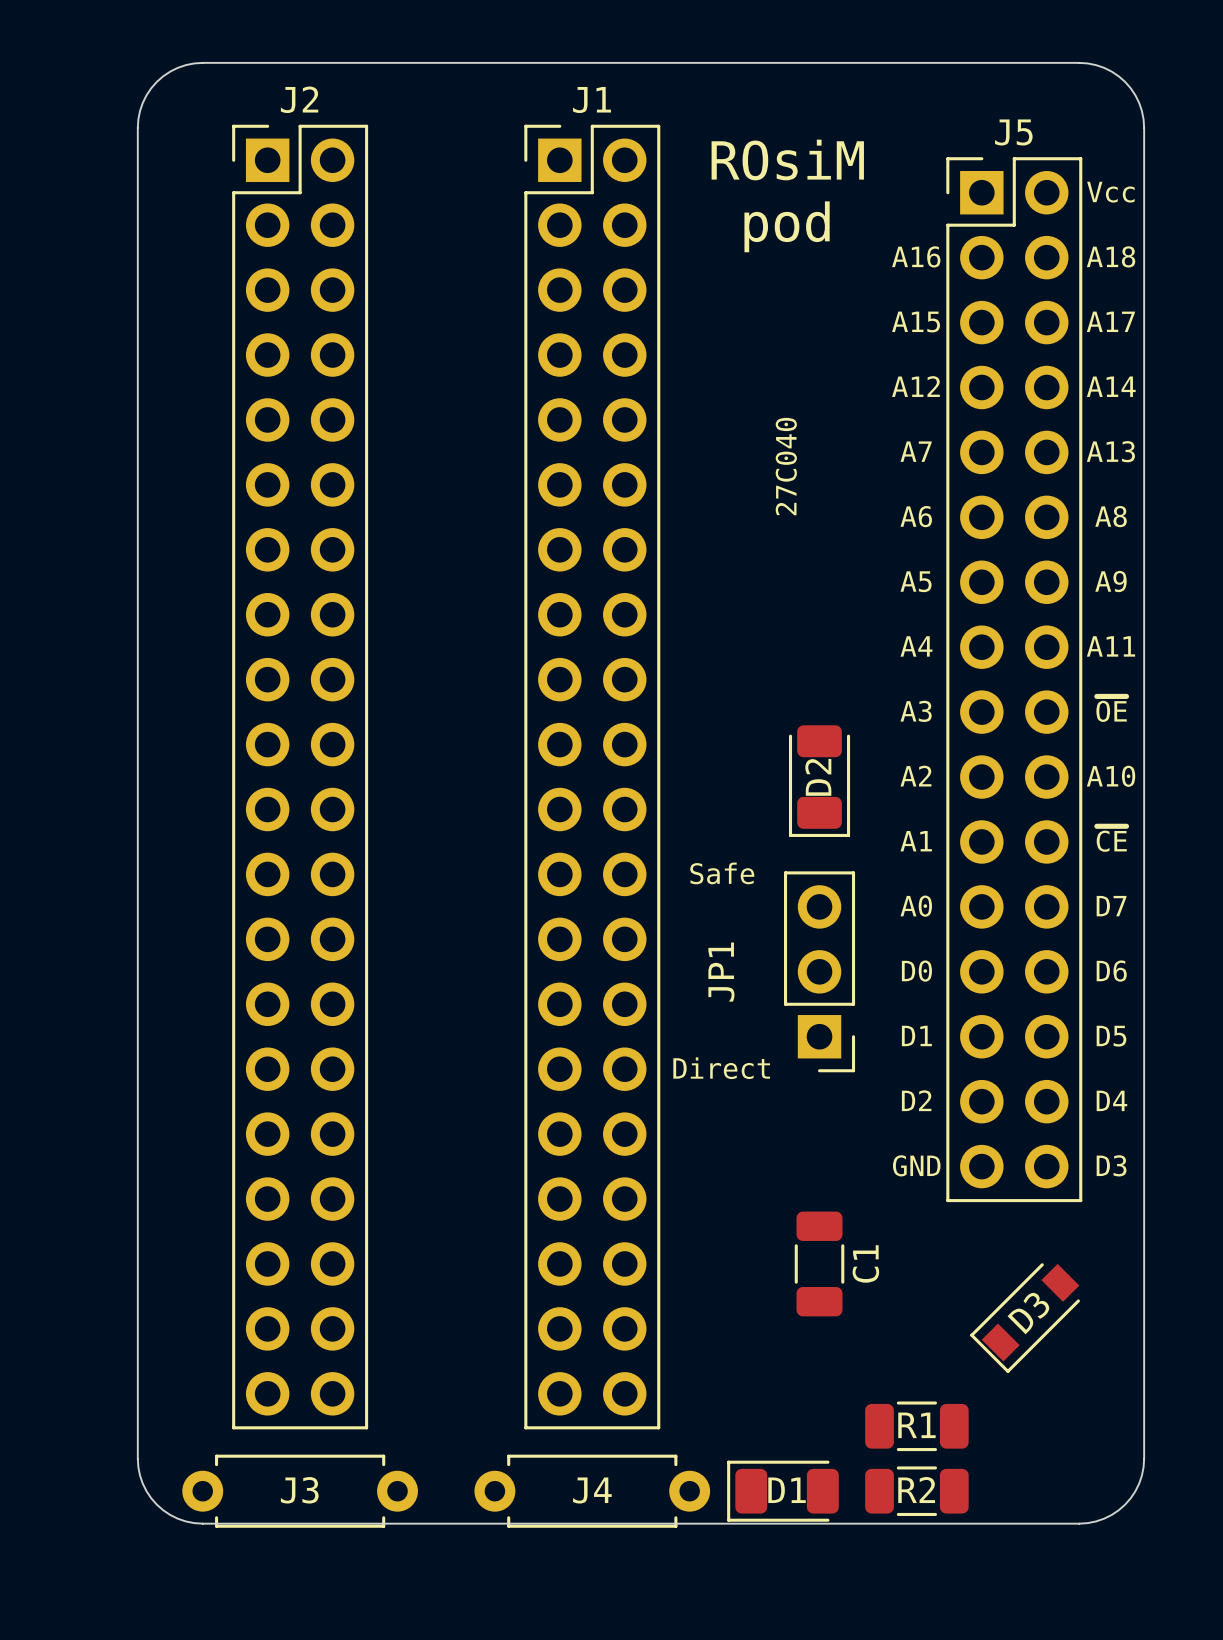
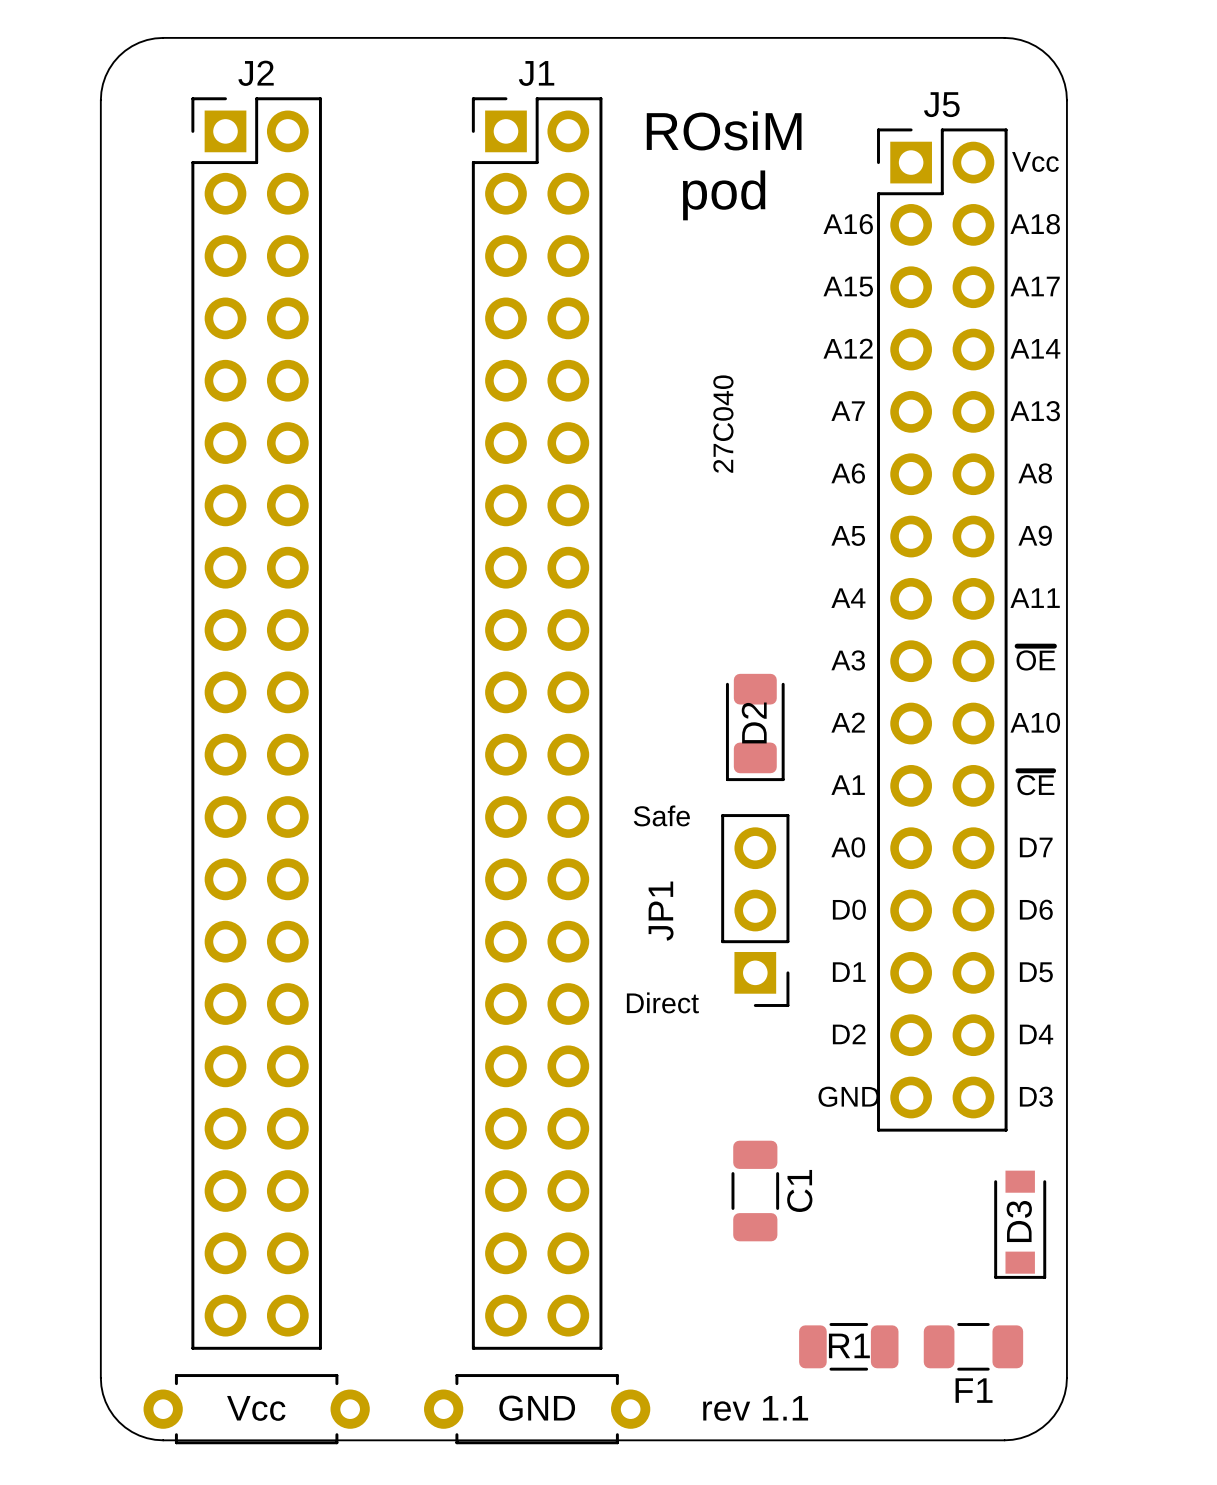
D3 rotation: 0° (1025, 1318) -> 45° counterclockwise (1020, 1224)
D3 position: (1025, 1318) -> (1020, 1224)
F1: none -> (973, 1346)
J3 name: J3 (299, 1490) -> none
text: none -> Vcc (256, 1408)
J4 name: J4 (592, 1490) -> none
text: none -> GND (537, 1408)
text: none -> rev 1.1 (755, 1408)
D1: (782, 1491) -> none
R2: (916, 1491) -> none

